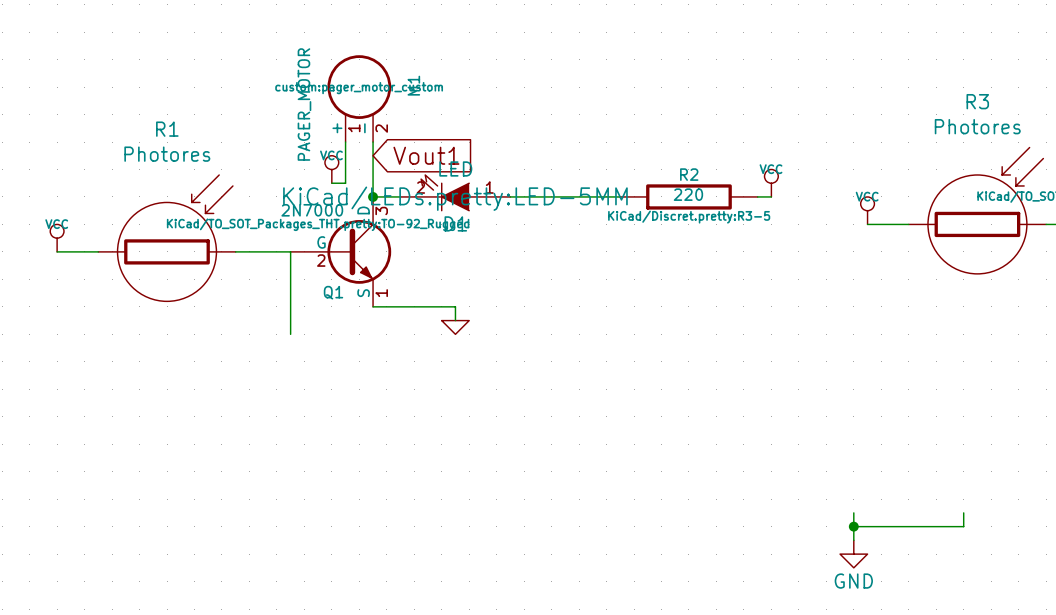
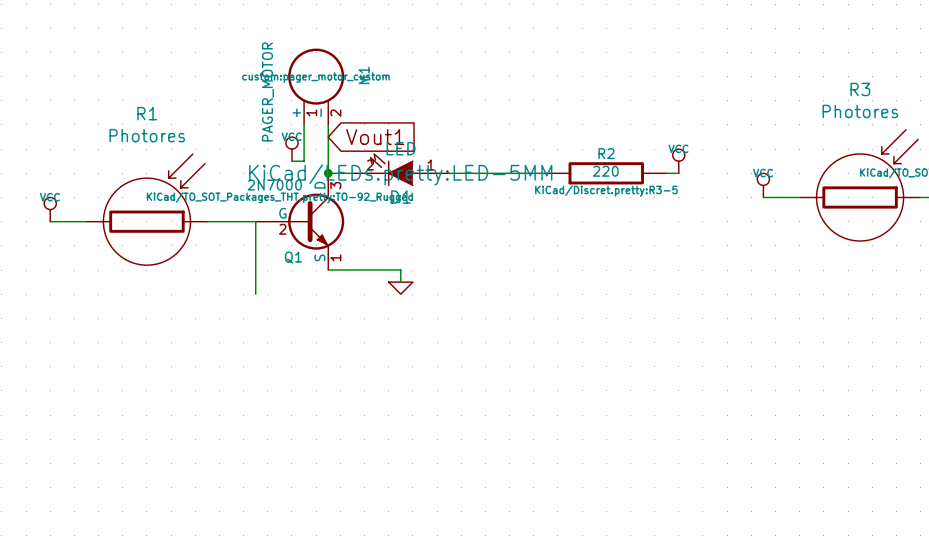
wire: (853, 512) (853, 540) -> none
wire: (963, 512) (963, 526) (853, 526) -> none
junction: (853, 526) -> none
power symbol: GND (853, 554) -> none

